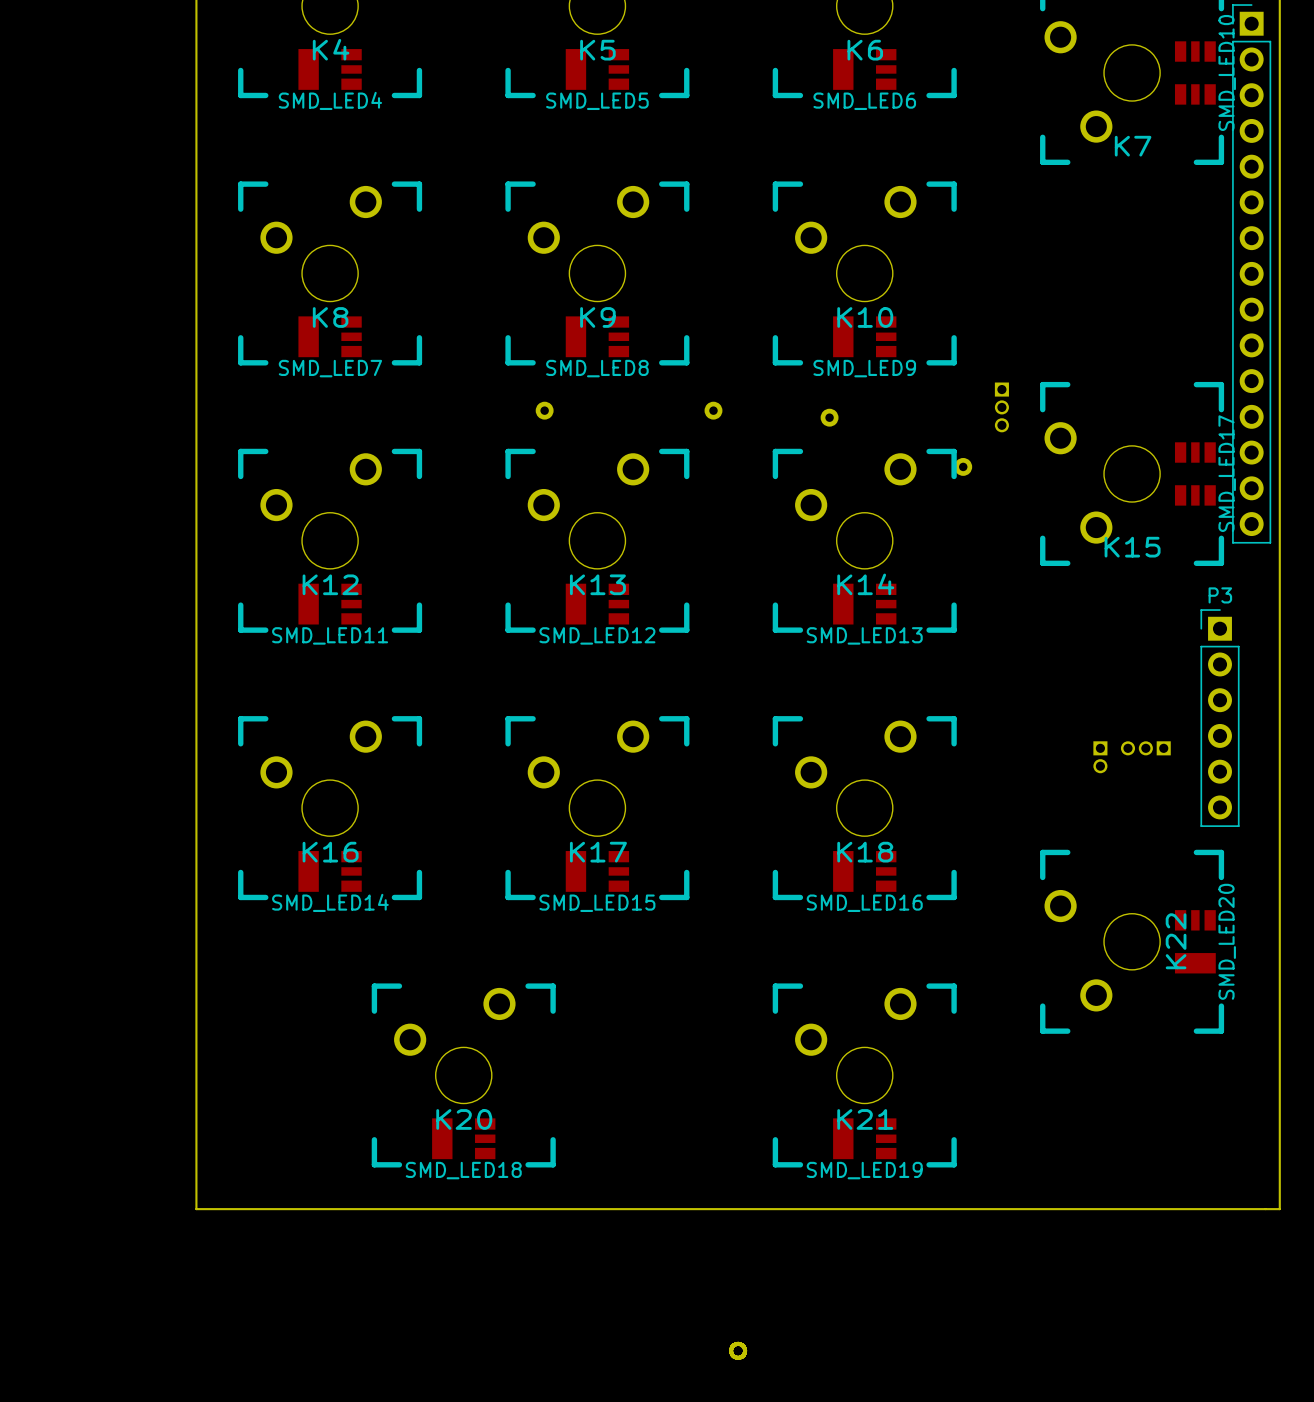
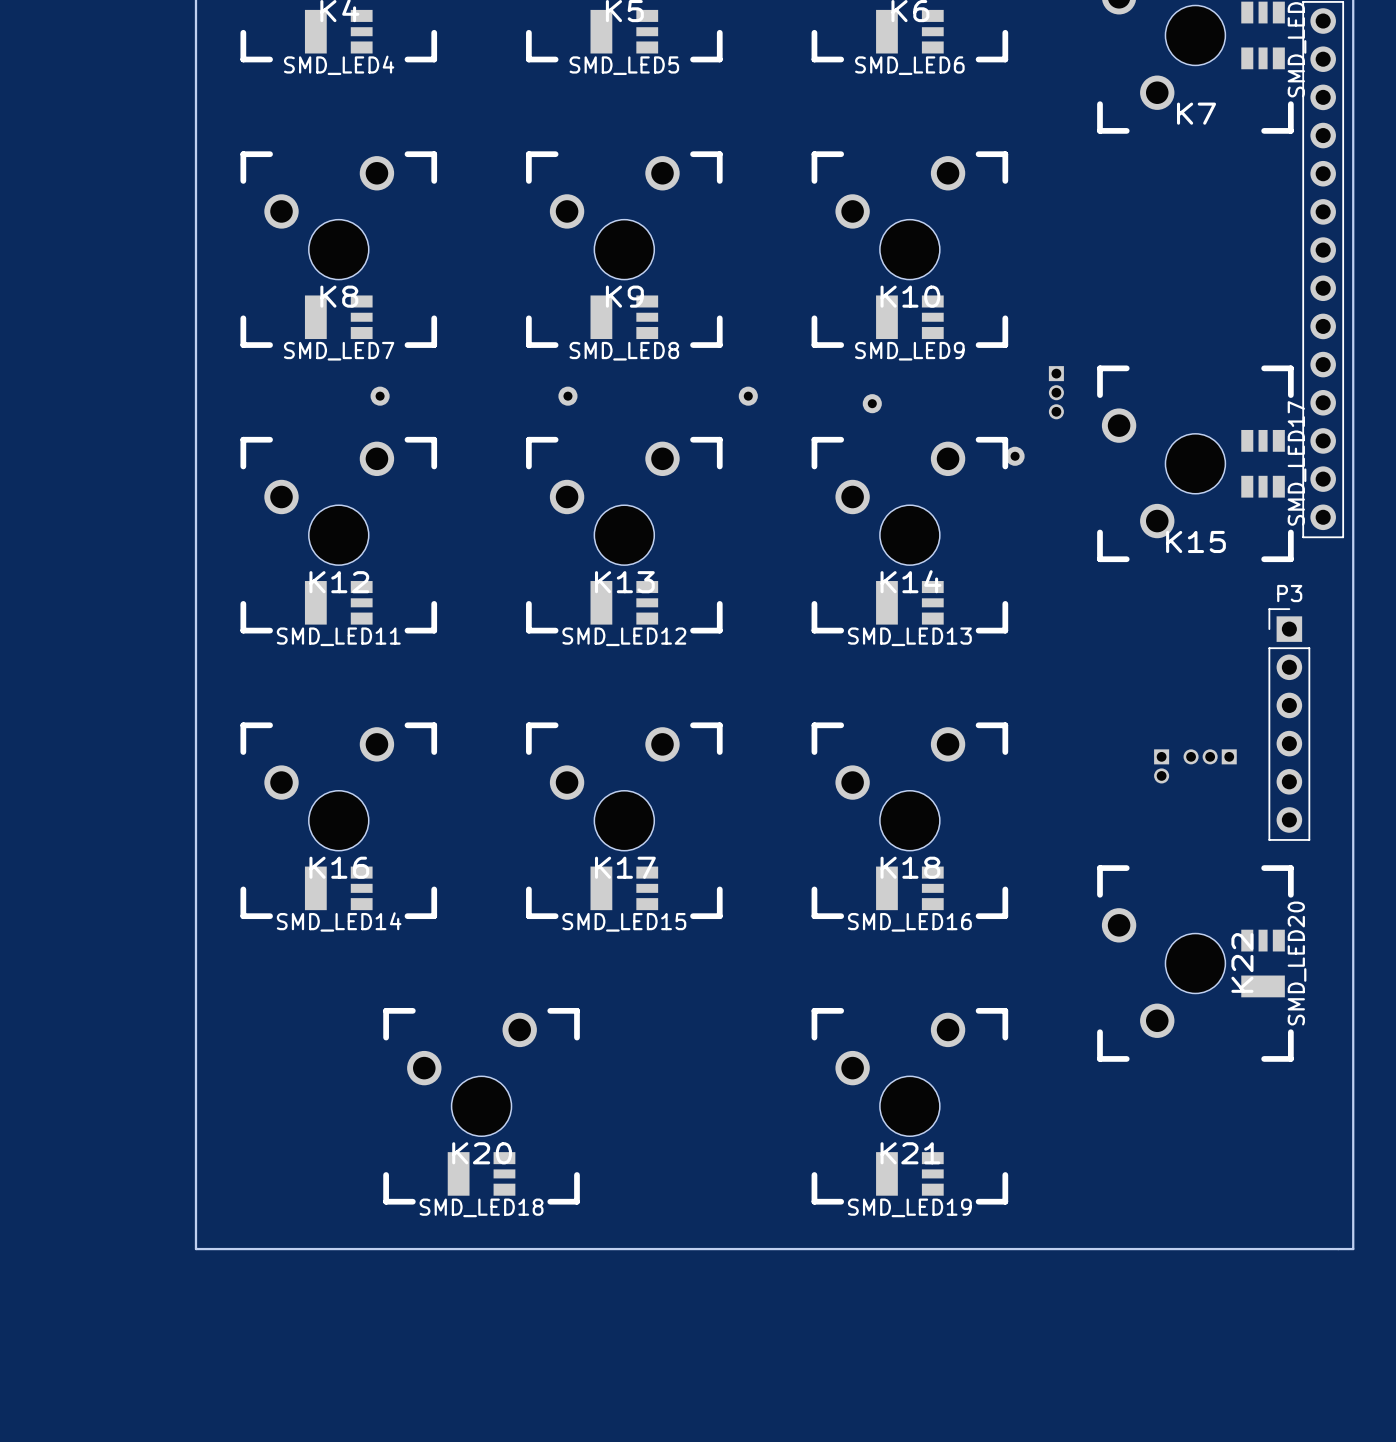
part: none -> (380, 396)
part: (738, 1350) -> none

